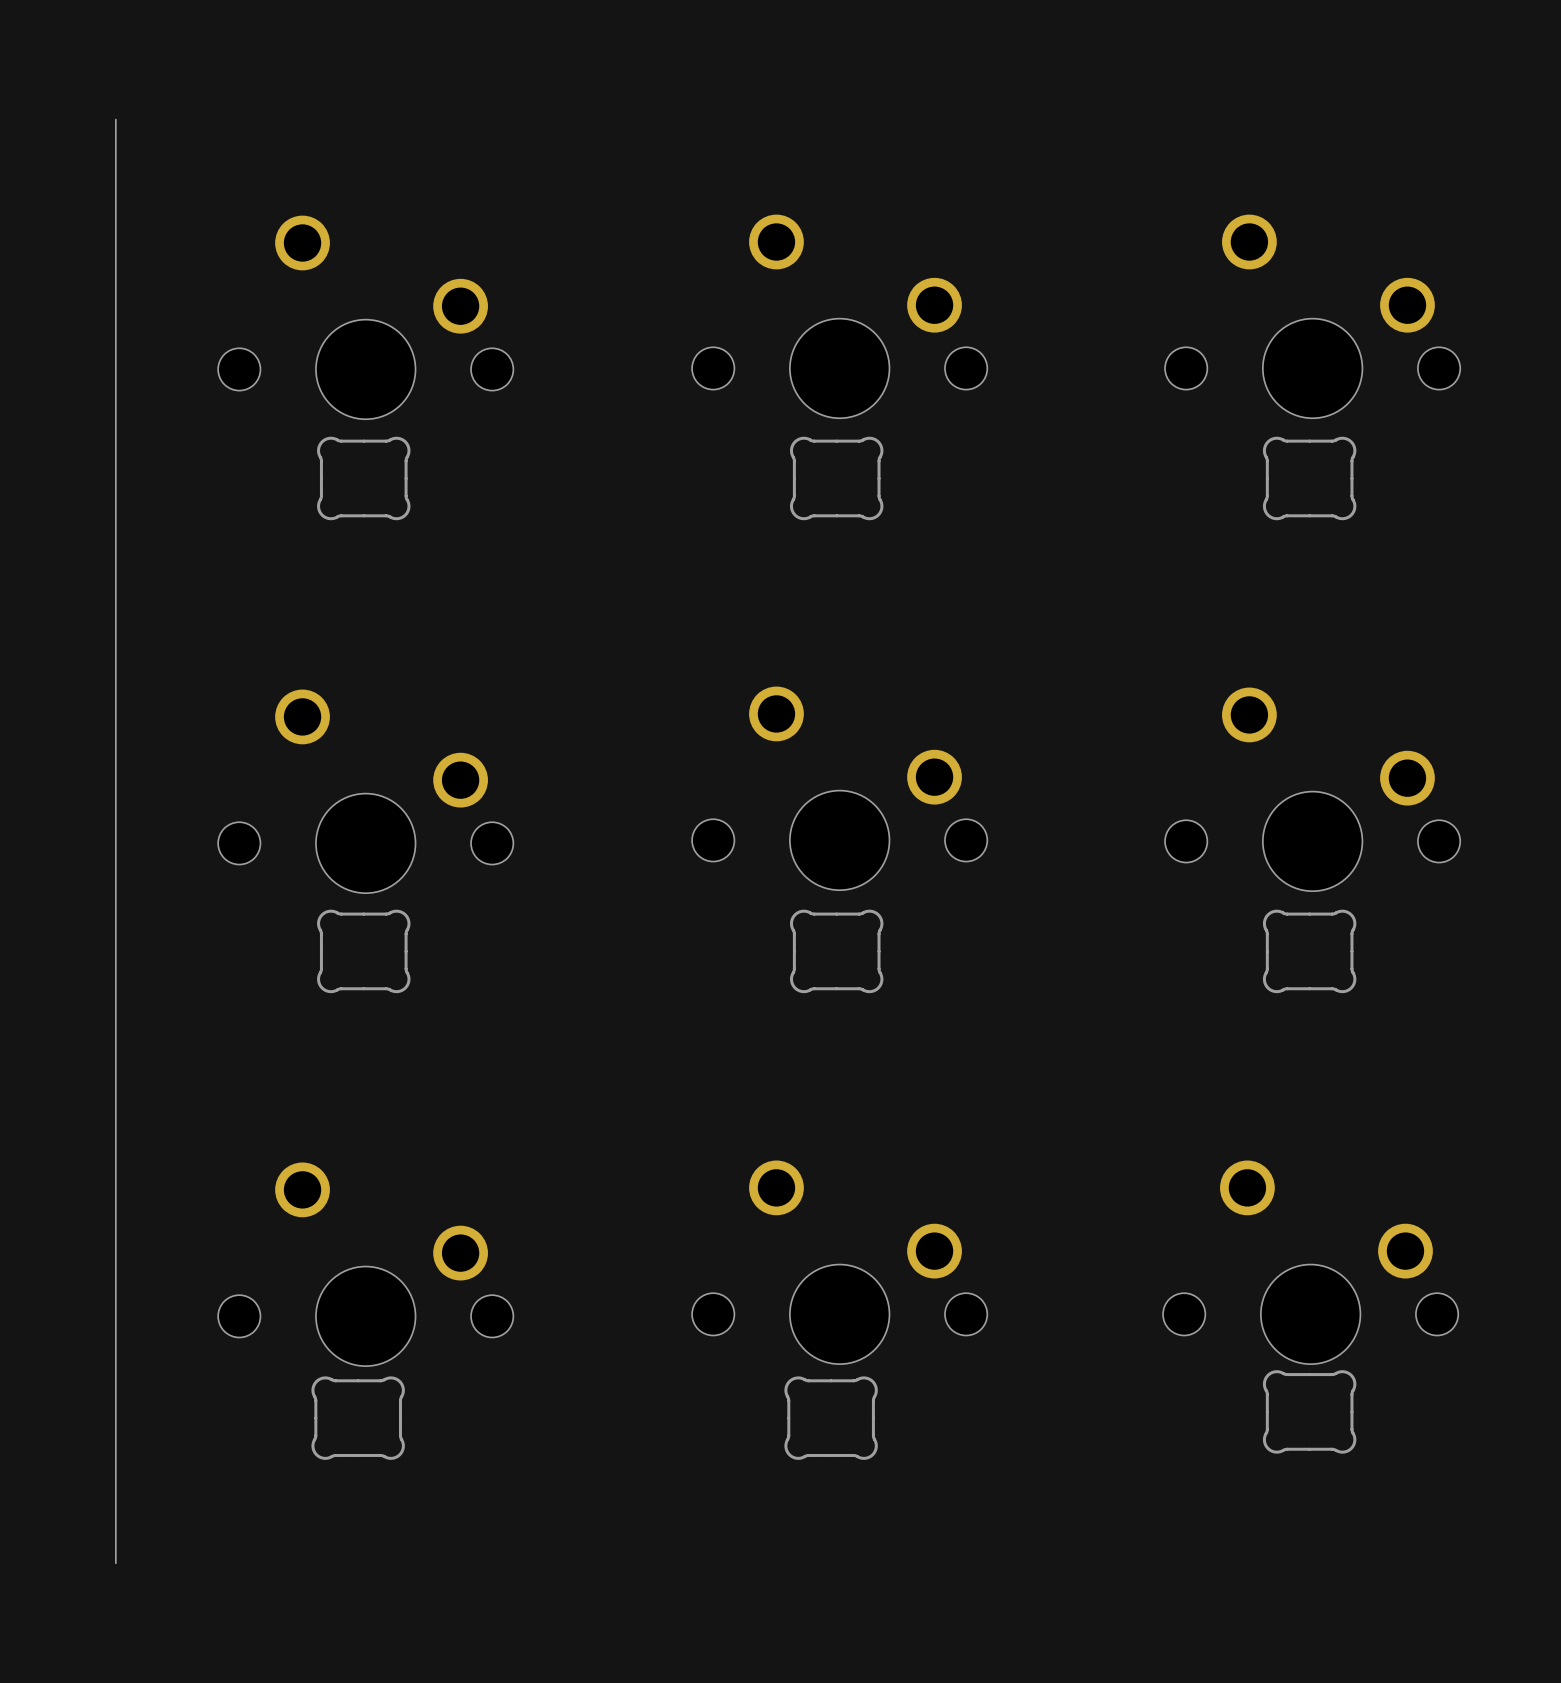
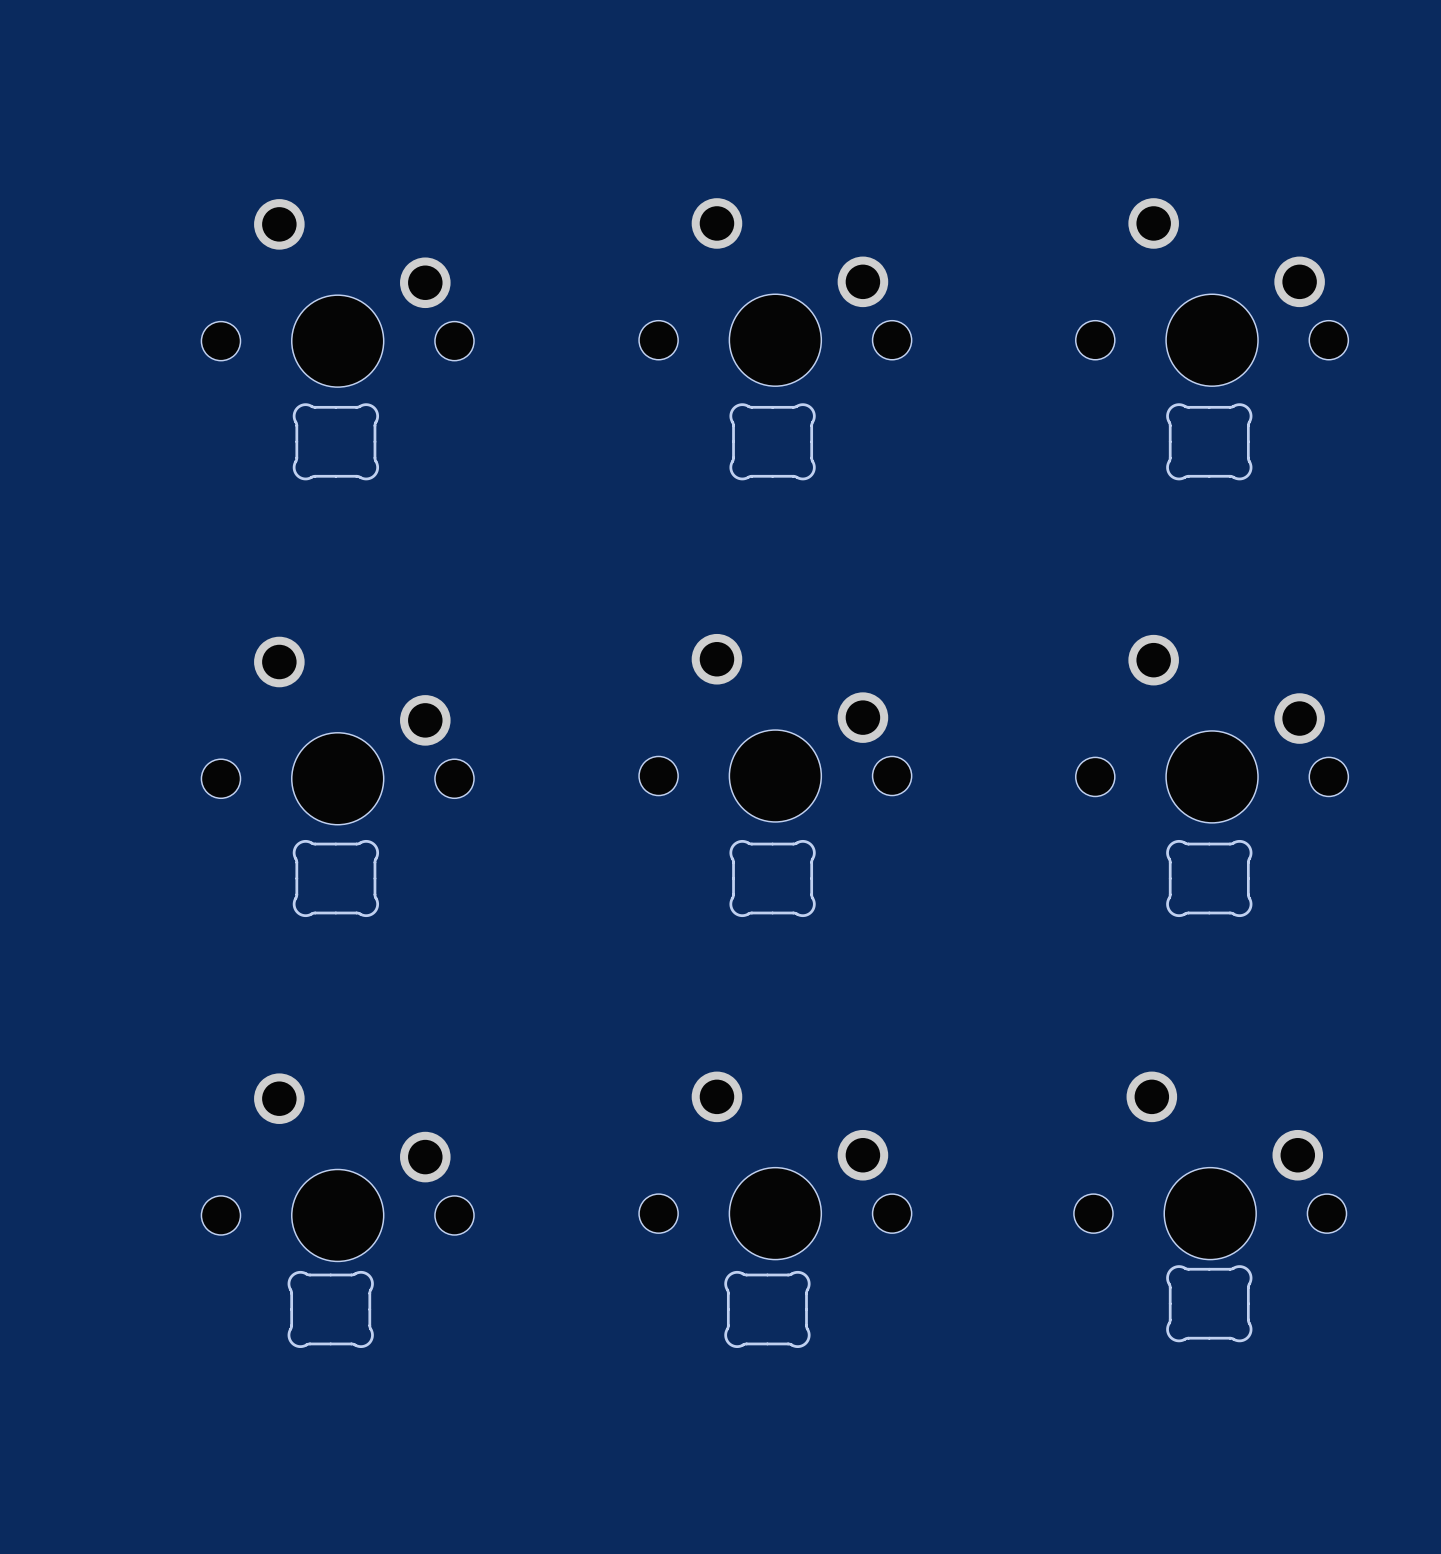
board edge: (115, 119) (115, 1563) -> none

